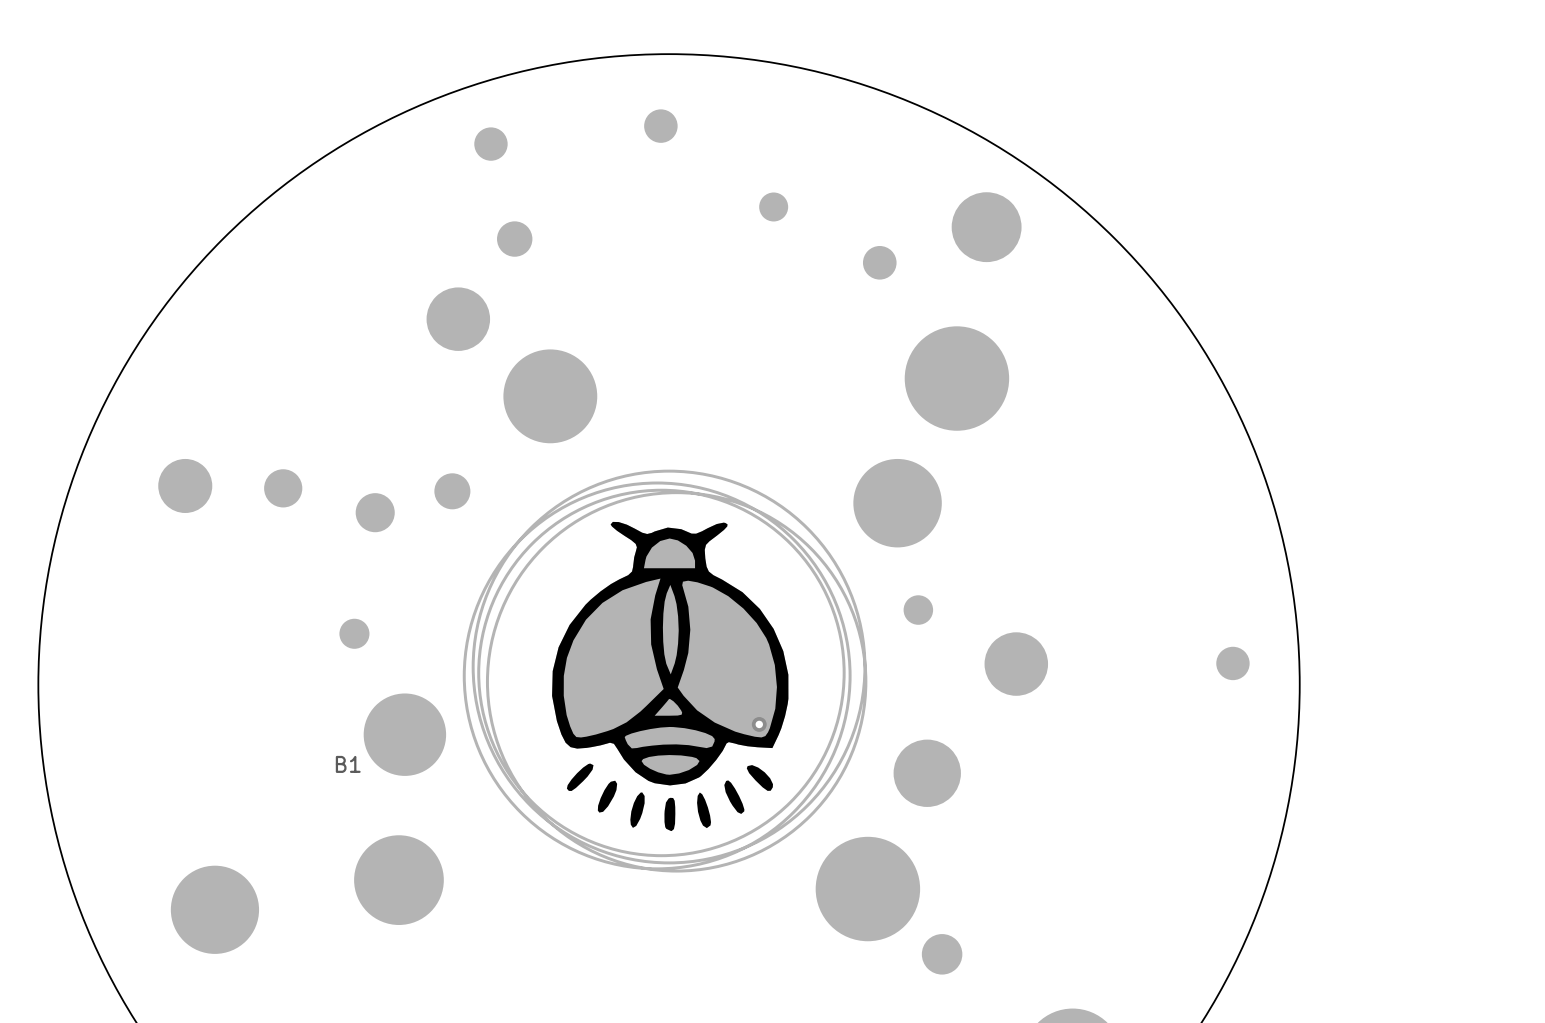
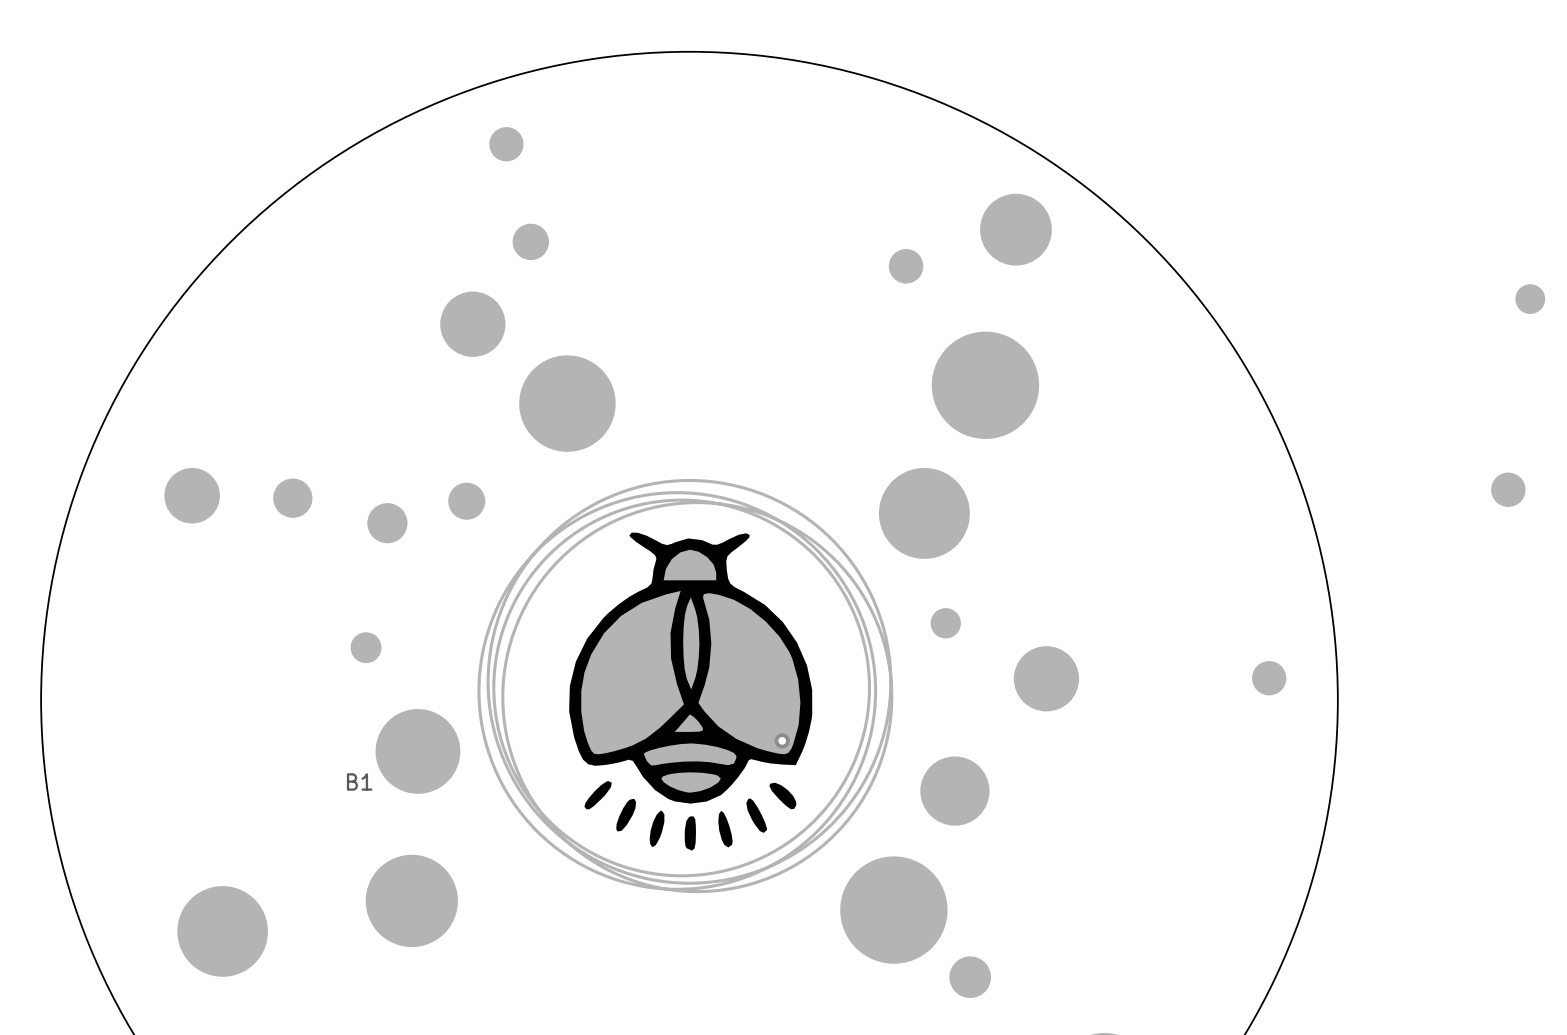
drawing: [644, 109, 678, 143] -> none
drawing: [759, 192, 789, 222] -> none
drawing: none -> [1515, 284, 1546, 314]
drawing: none -> [1491, 472, 1526, 508]

